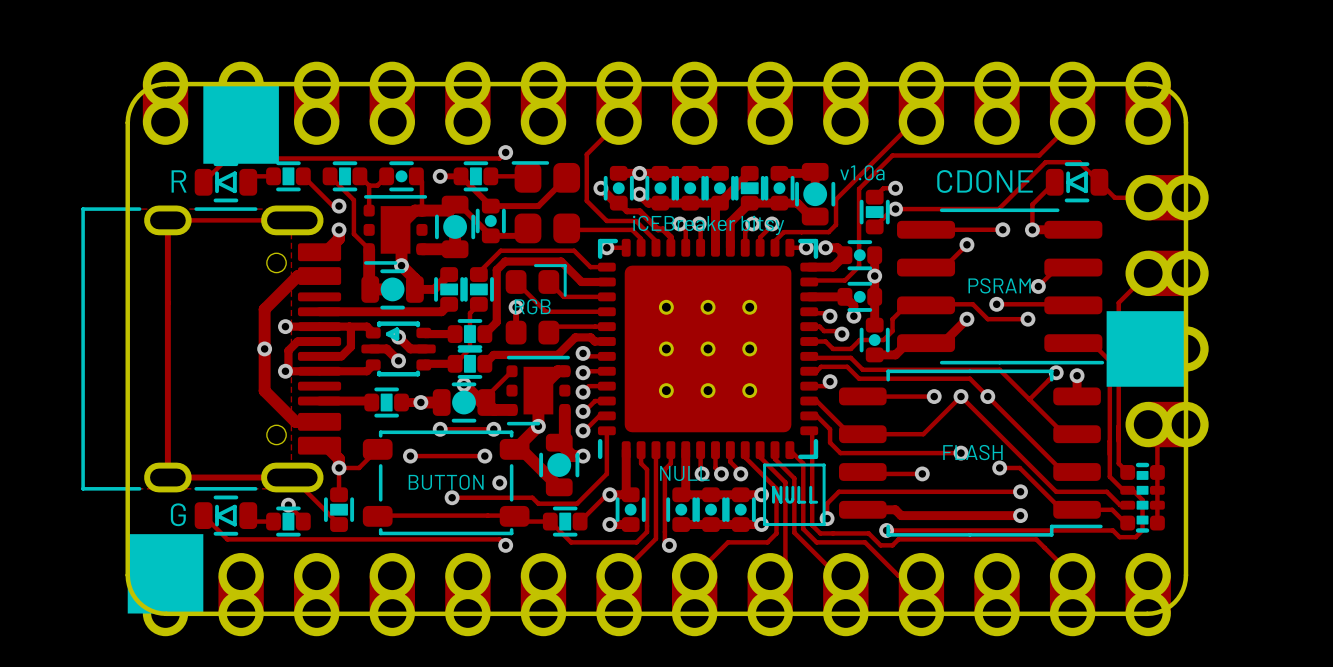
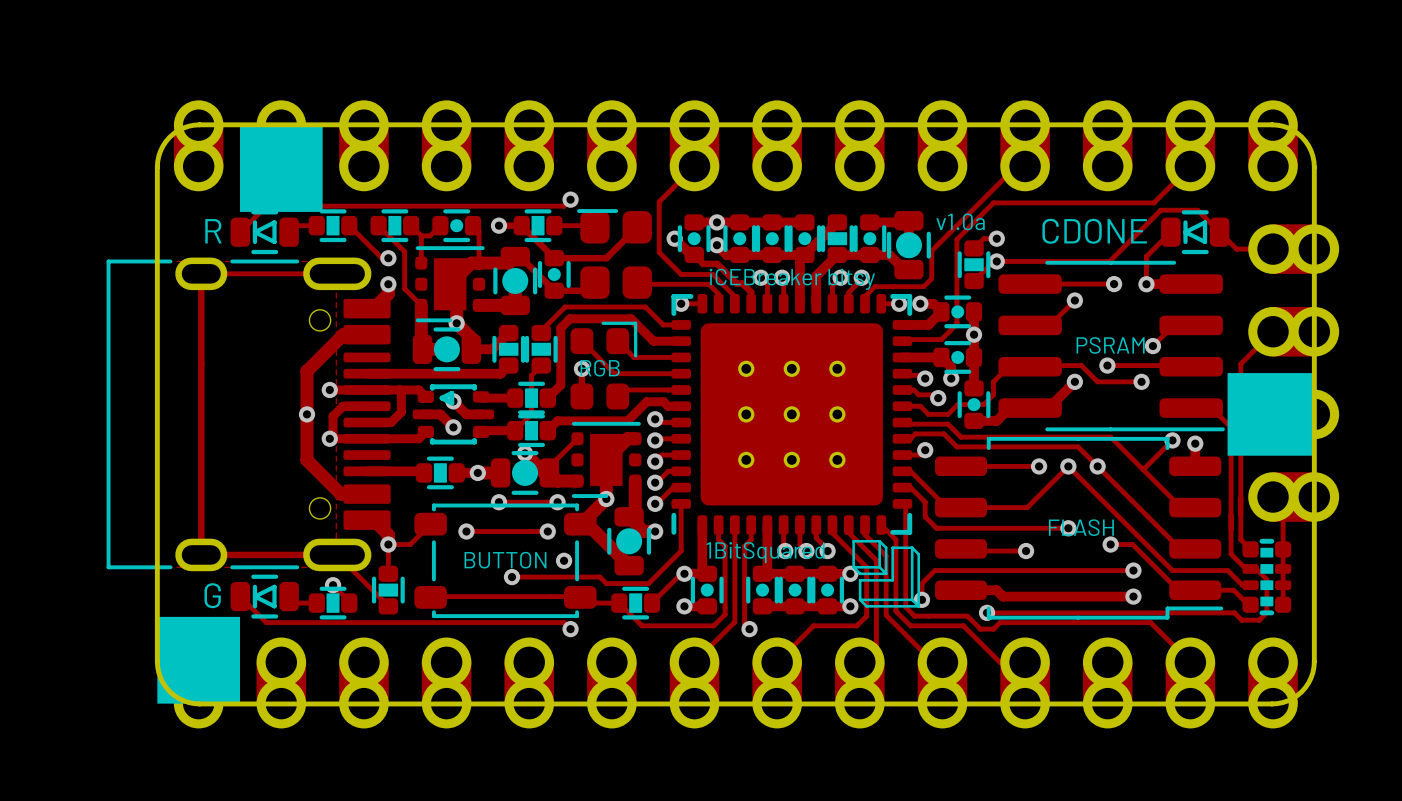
drawing shape: [763, 463, 826, 527] -> [852, 539, 921, 608]
text: NULL (684, 473) -> 1BitSquared (765, 552)

